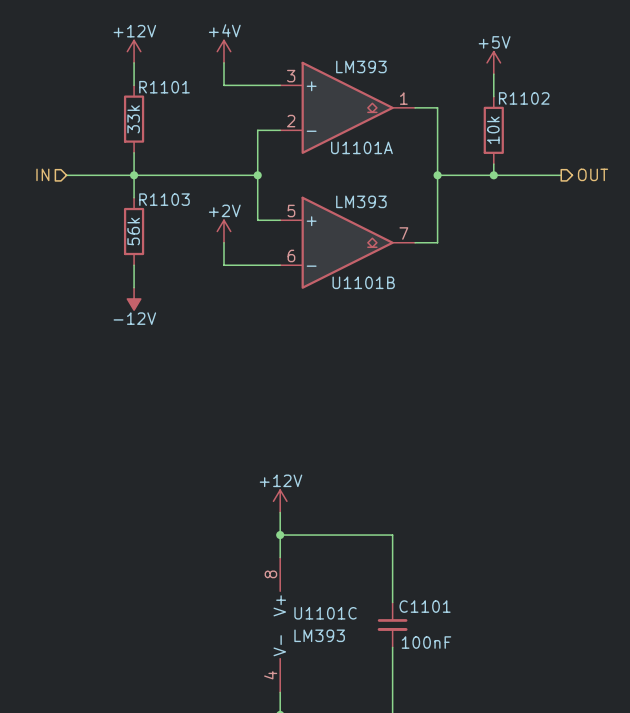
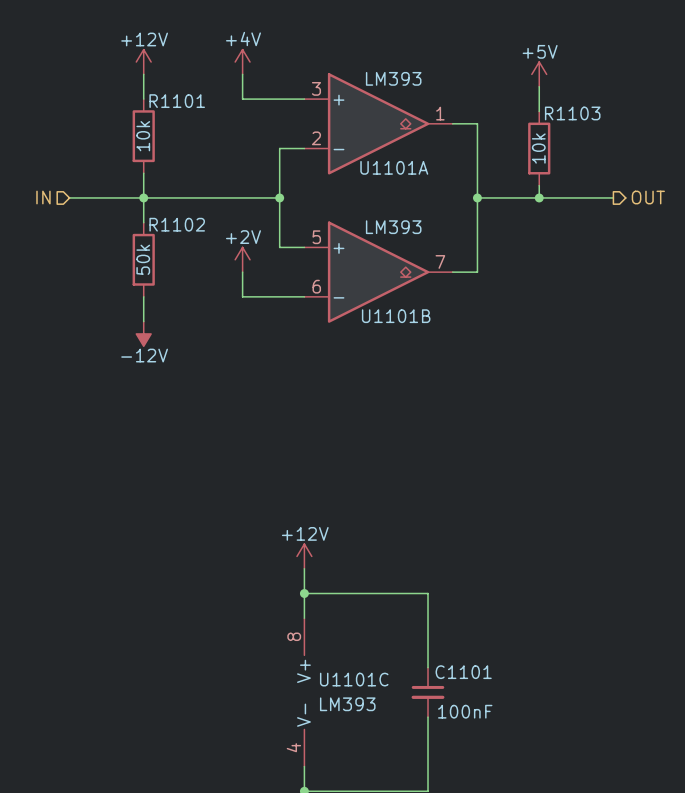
R1102 name: R1102 (524, 98) -> R1103 (572, 113)
R1101 value: 33k (133, 119) -> 10k (143, 136)
R1103 name: R1103 (164, 199) -> R1102 (177, 224)
R1103 value: 56k (133, 231) -> 50k (143, 259)

